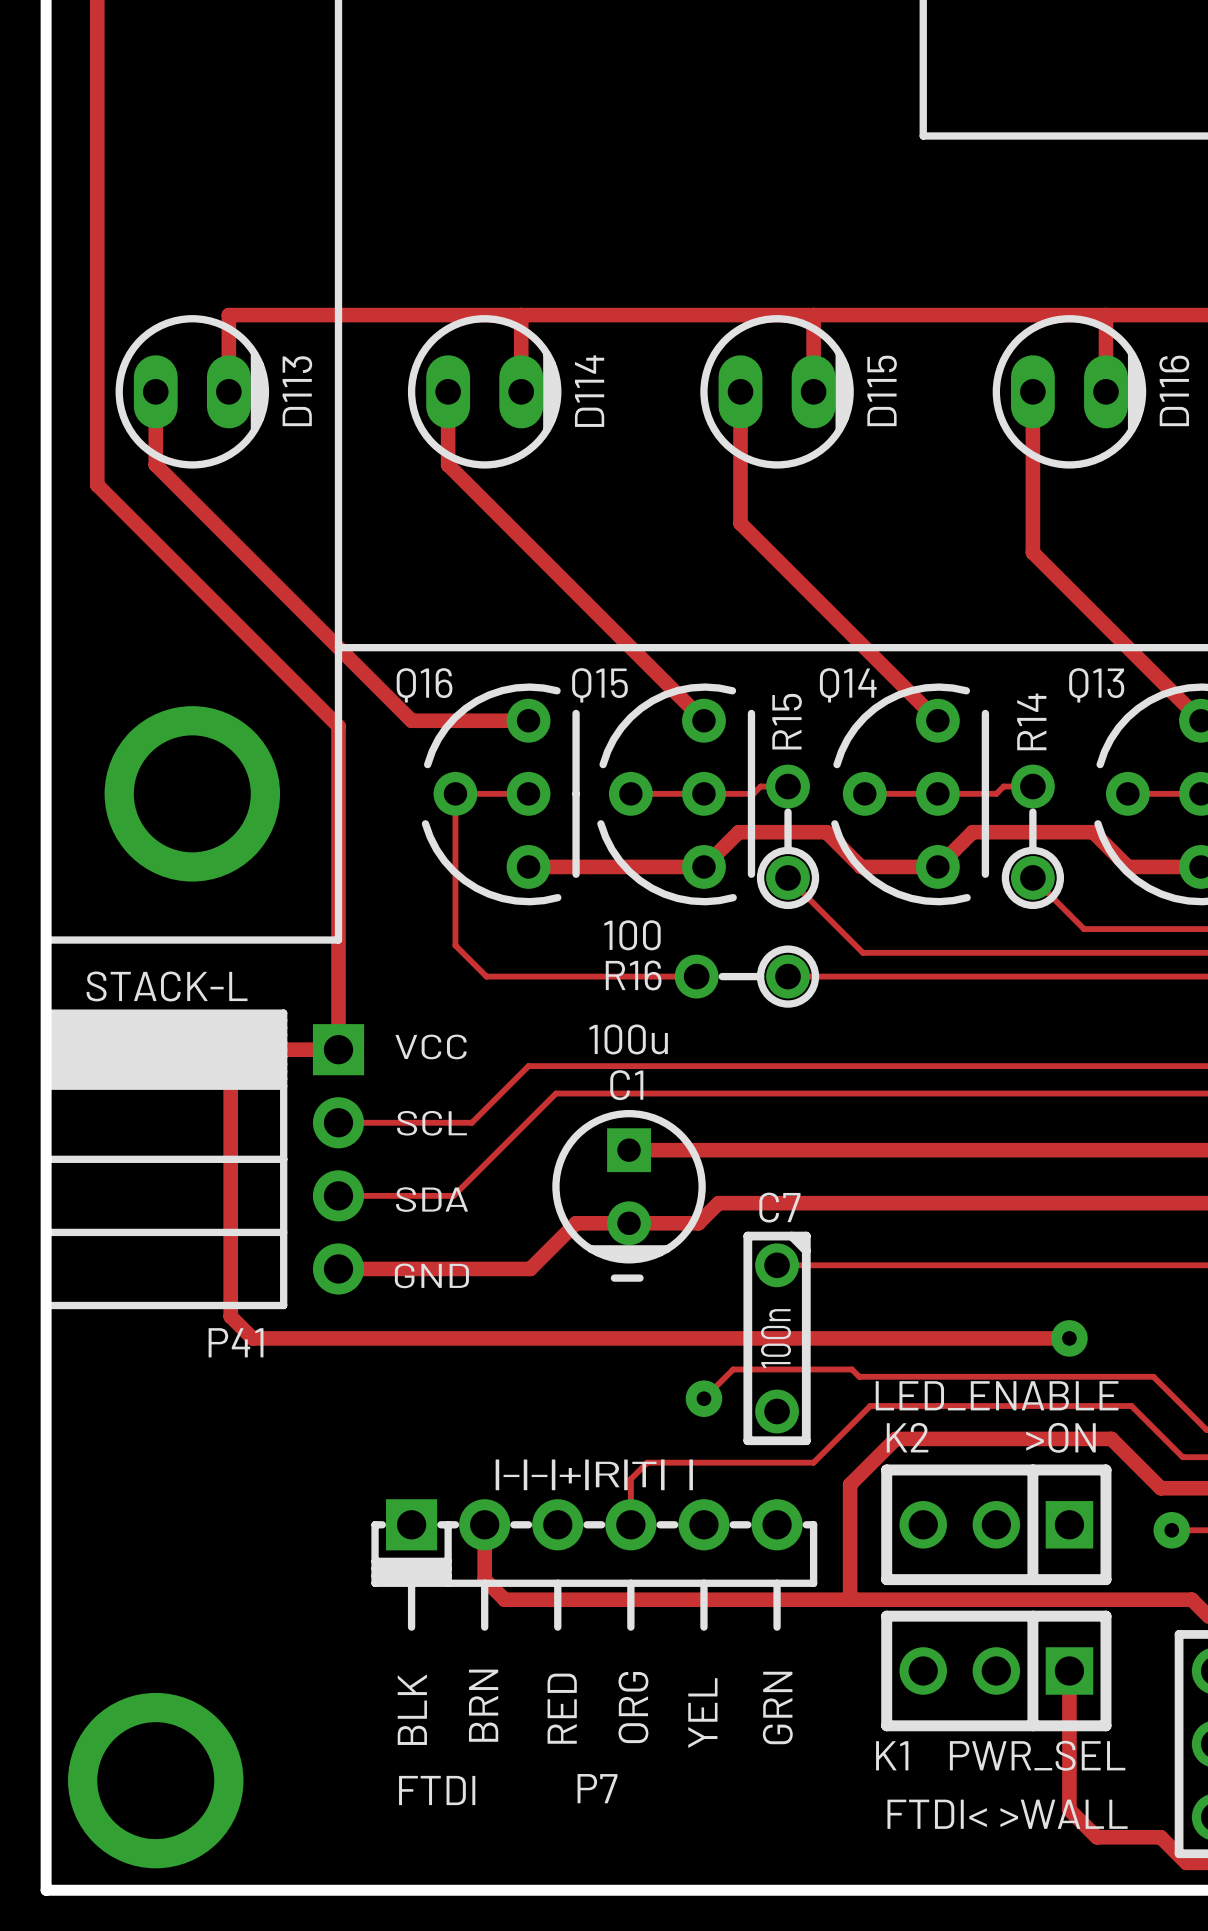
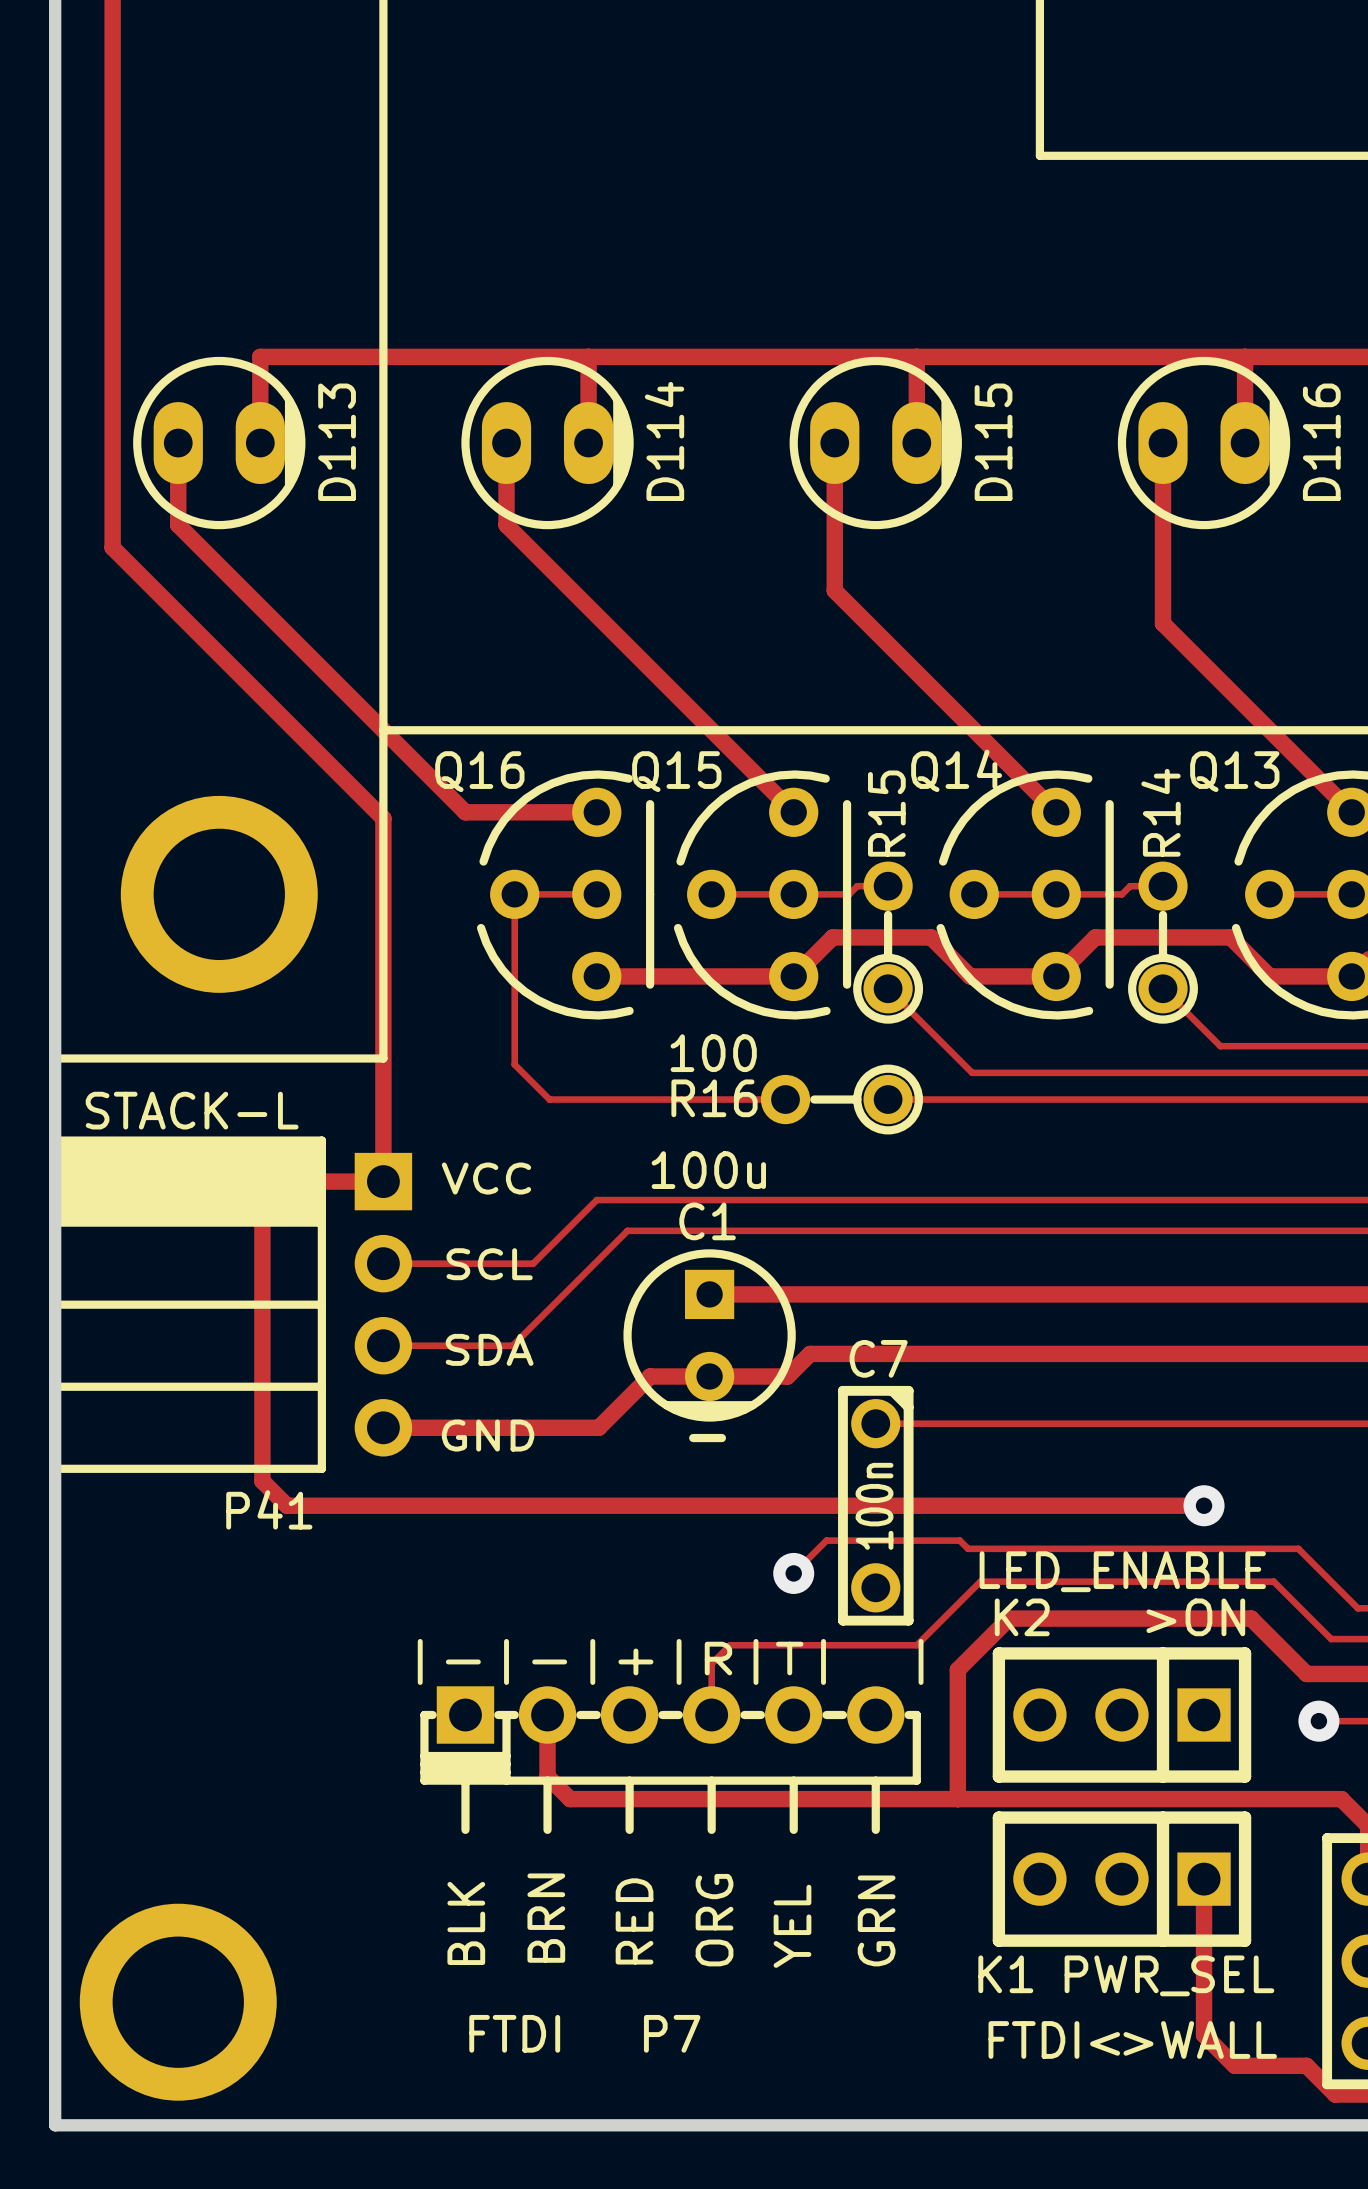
P7 name position: P7 (597, 1788) -> P7 (672, 2033)
P7 value position: FTDI (437, 1790) -> FTDI (514, 2033)

